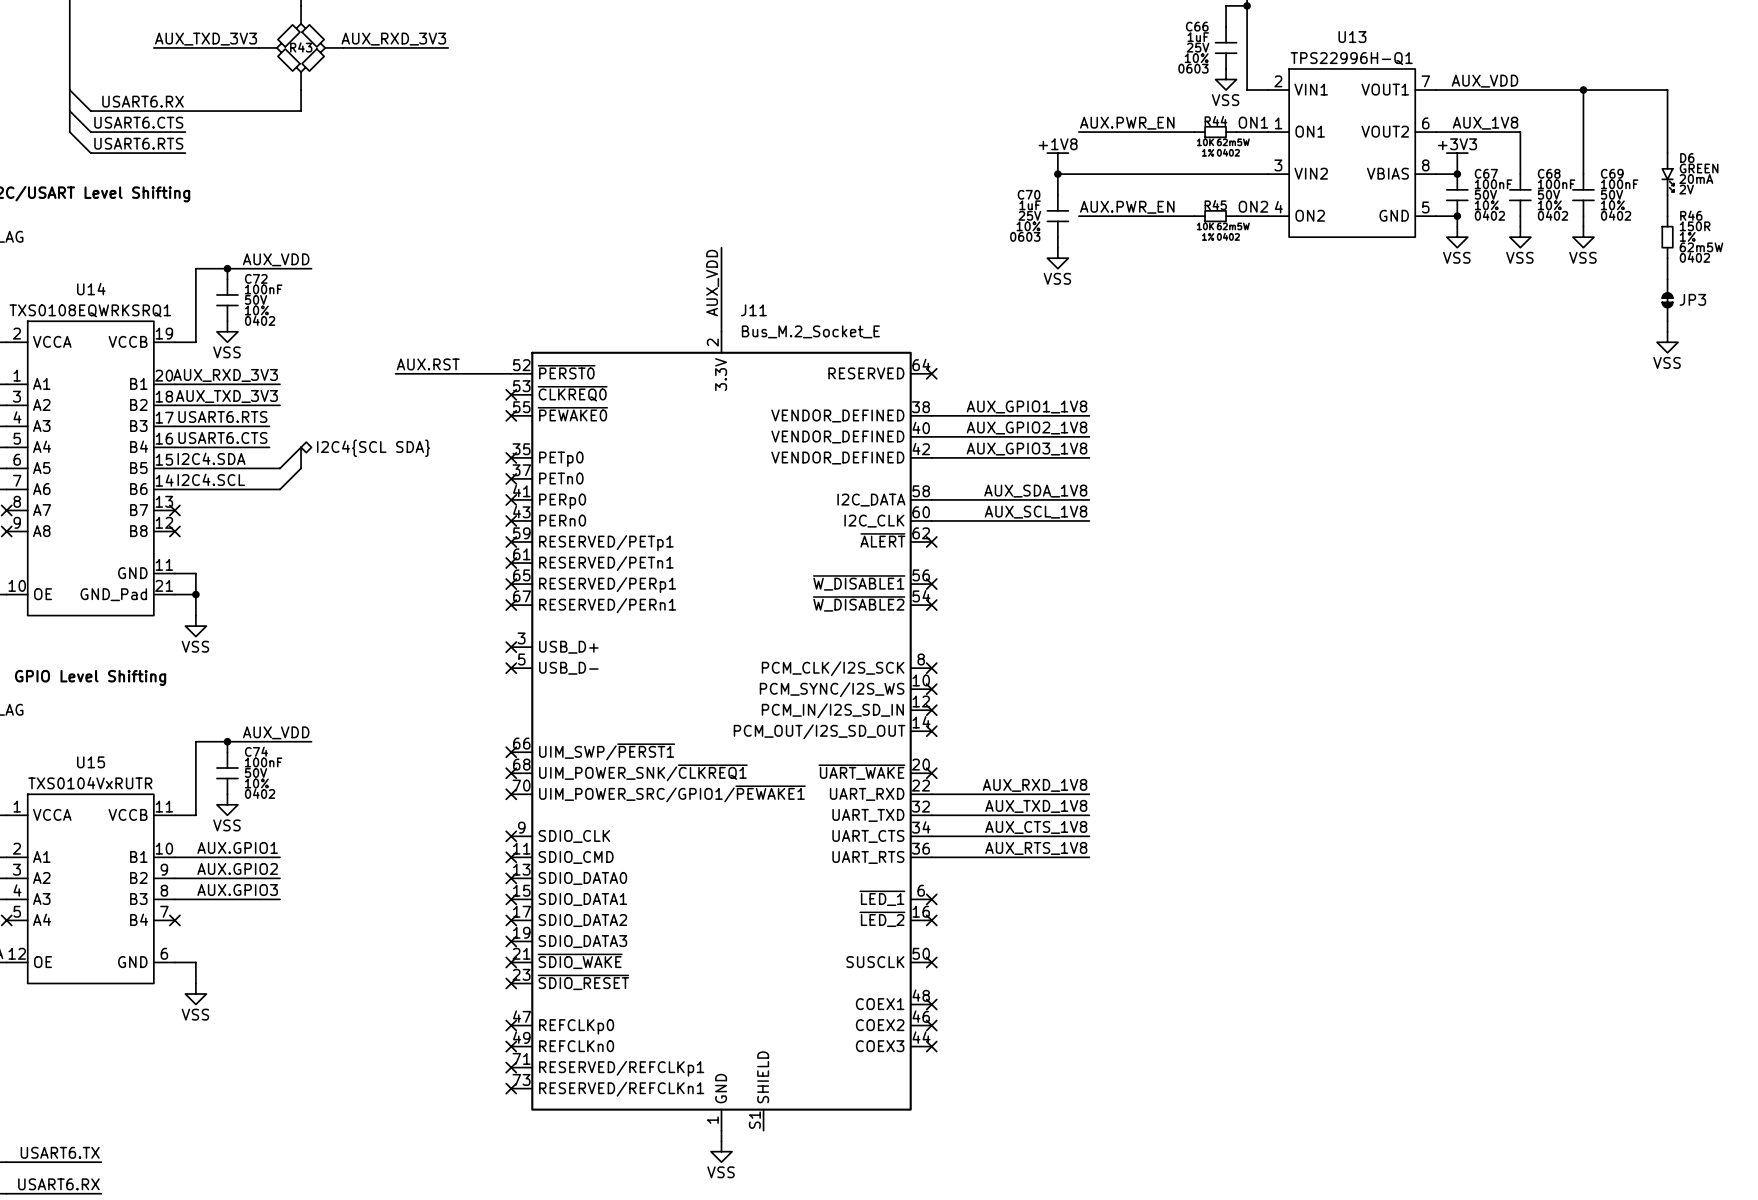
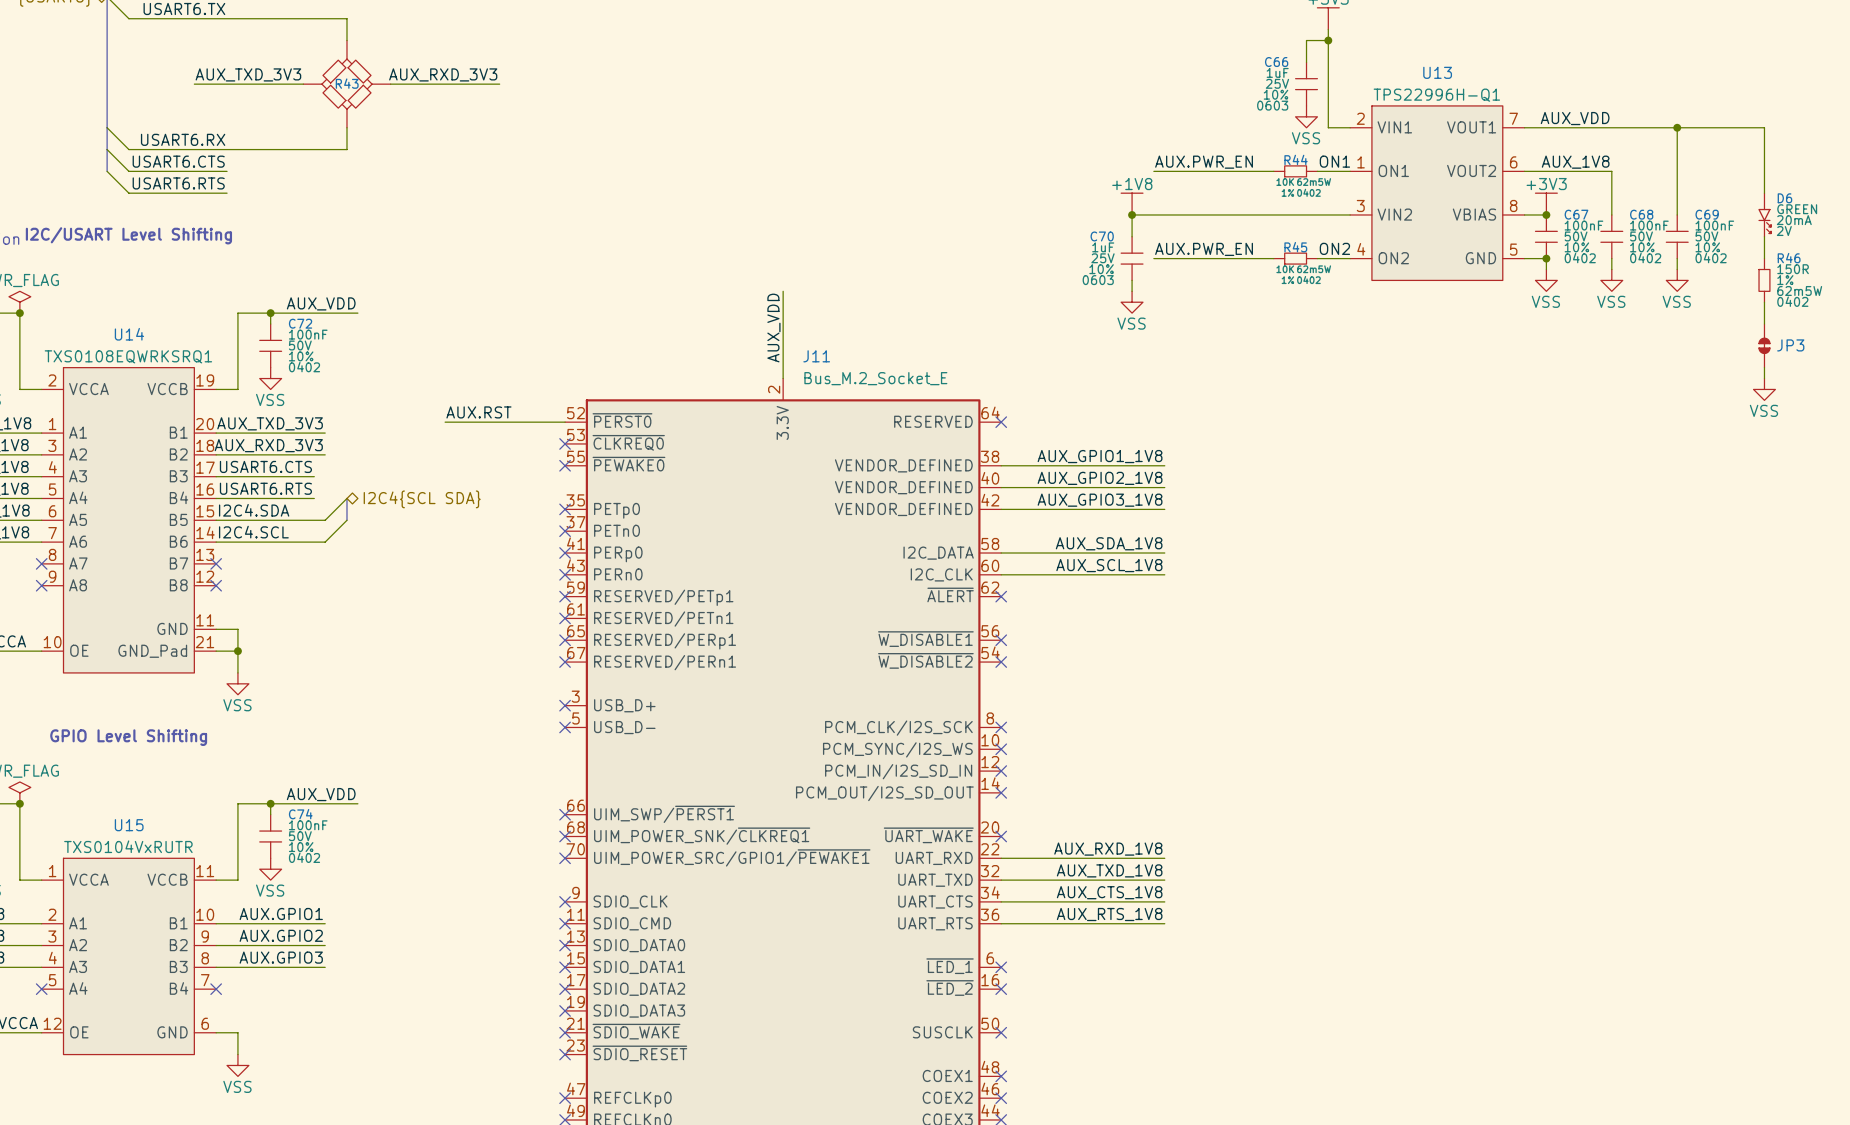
label: AUX_RXD_3V3 (225, 375) -> AUX_TXD_3V3 (270, 423)
label: AUX_TXD_3V3 (226, 396) -> AUX_RXD_3V3 (268, 445)
label: USART6.RTS (222, 416) -> USART6.CTS (265, 466)
label: USART6.CTS (222, 438) -> USART6.RTS (265, 488)

